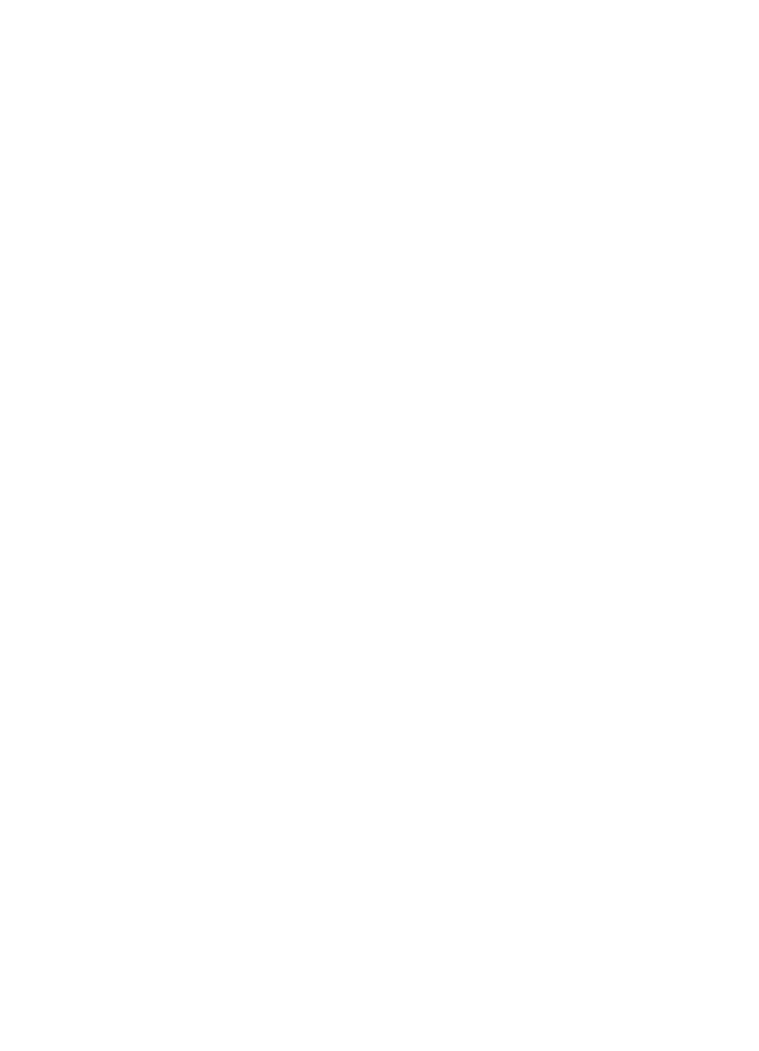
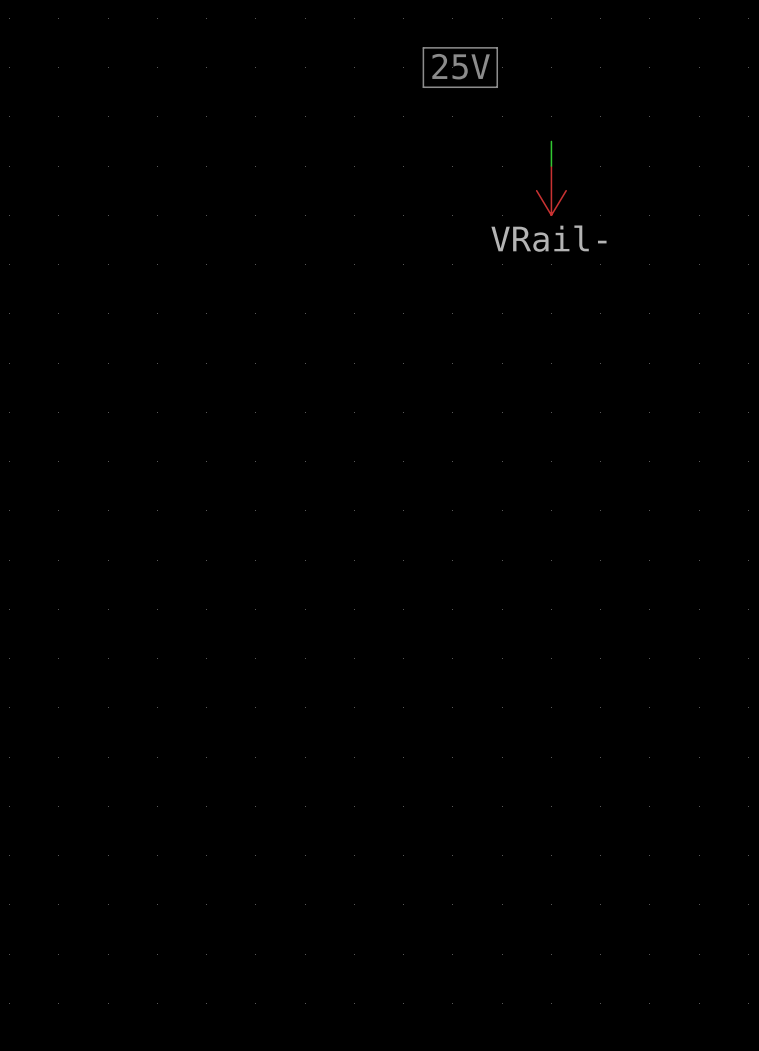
line: none -> (423, 47) (497, 47) (497, 87) (423, 87) (423, 47)
text: none -> 25V (461, 66)
wire: none -> (551, 141) (551, 166)
power symbol: none -> VRail- (551, 190)

